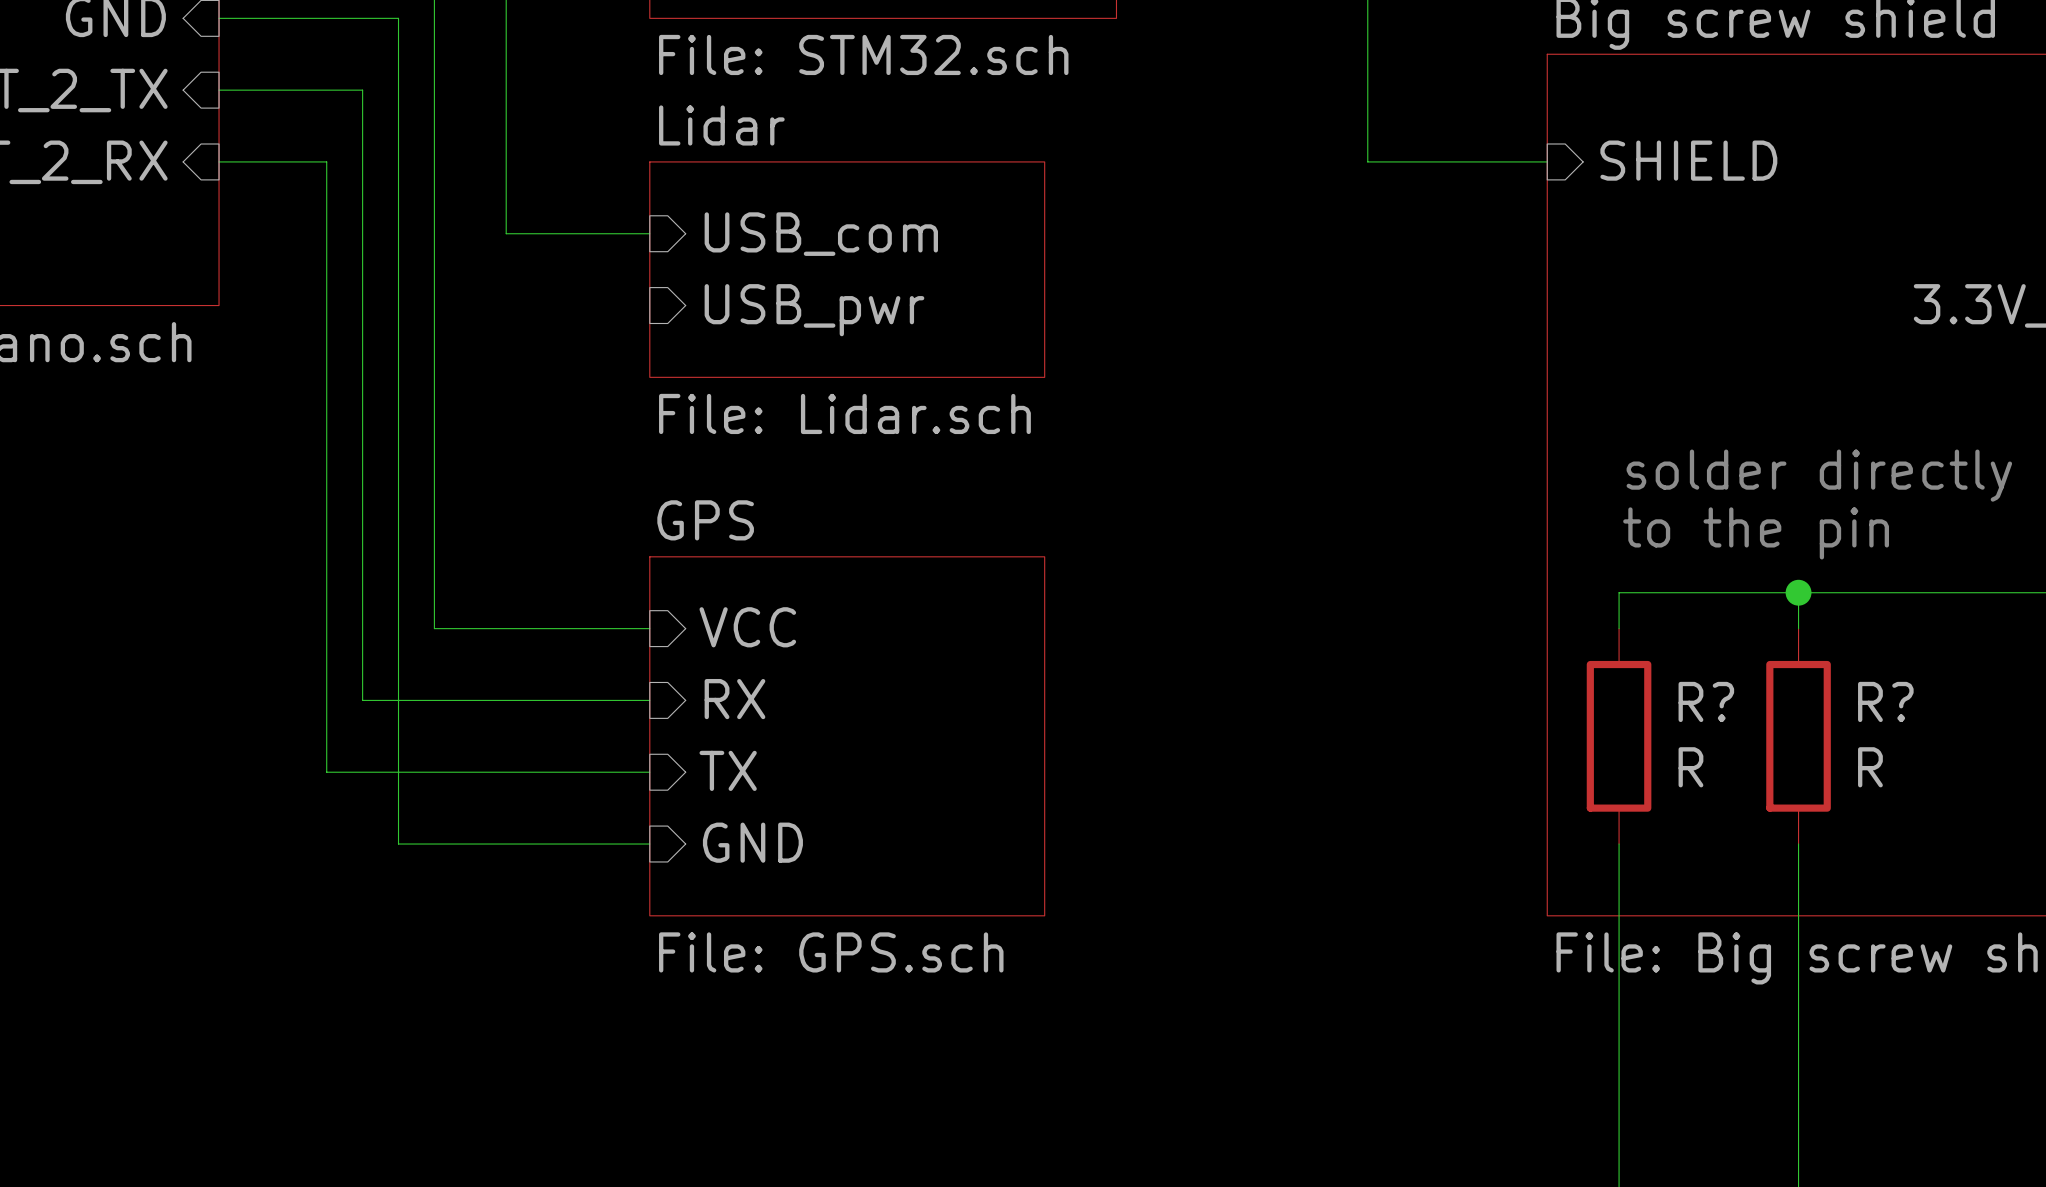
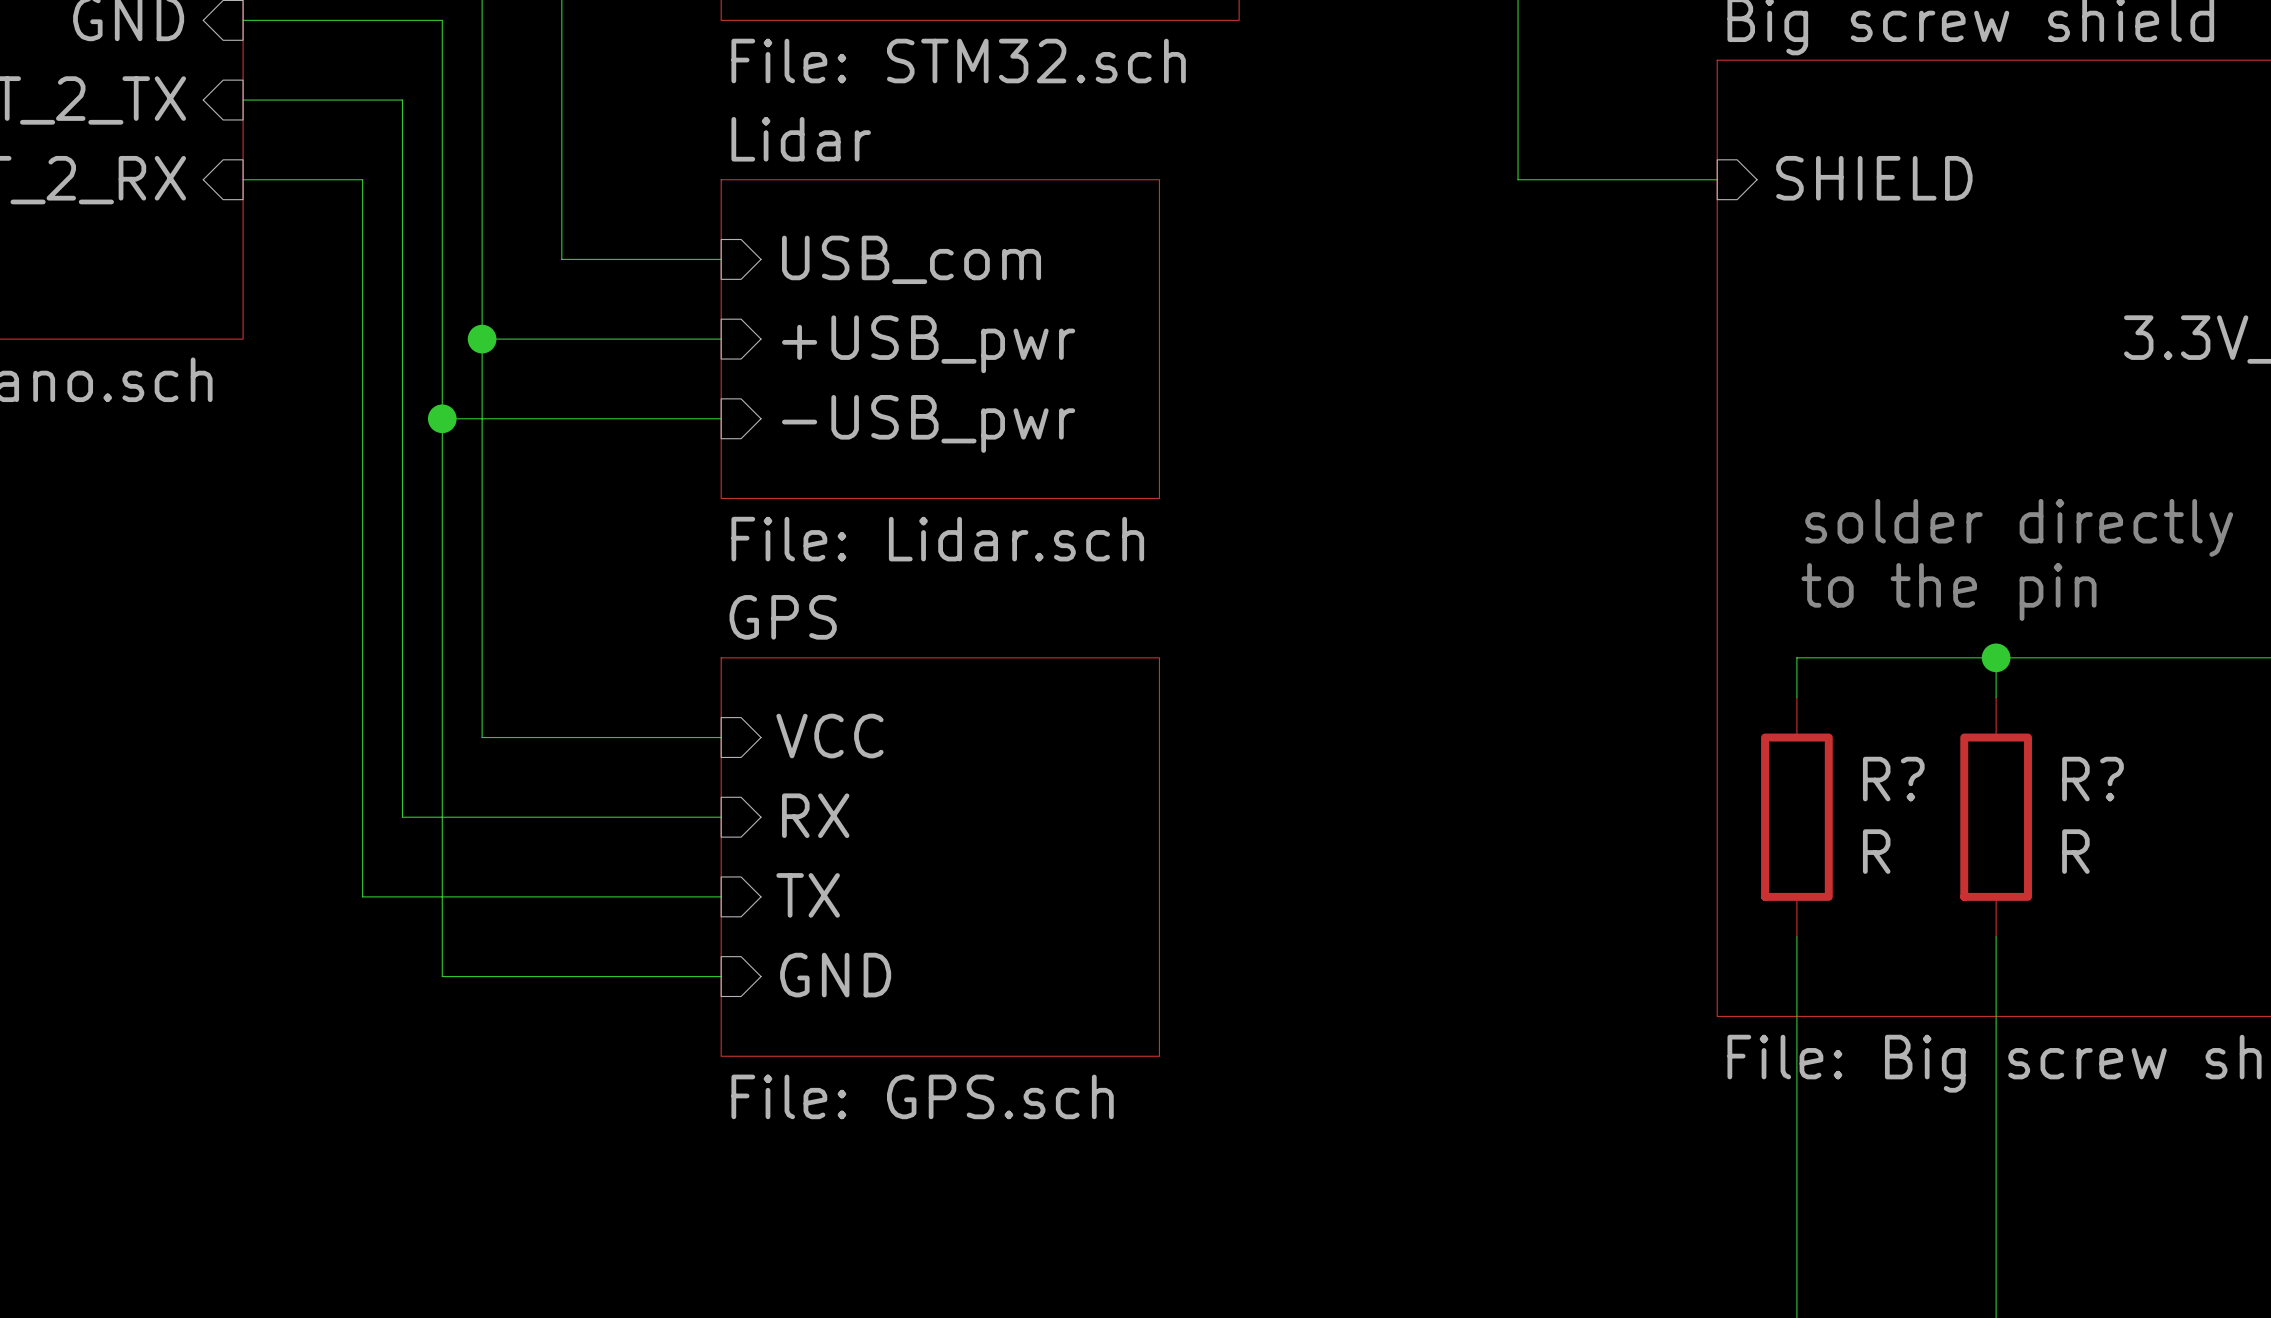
sheet Lidar: File: Lidar.sch (847, 269) -> none
wire: none -> (482, 339) (721, 339)
junction: none -> (482, 339)
sheet Lidar: none -> File: Lidar.sch (940, 339)
sheet pin: USB_pwr (814, 310) -> +USB_pwr (928, 344)
wire: none -> (442, 418) (721, 418)
junction: none -> (442, 418)
sheet pin: none -> -USB_pwr (928, 423)
sheet pin position: VCC (747, 627) -> VCC (829, 736)
wire: (434, 628) (649, 628) -> (482, 697) (482, 737) (721, 737)
sheet pin position: RX (734, 699) -> RX (815, 815)
wire: (362, 700) (649, 700) -> (402, 777) (402, 817) (721, 817)
sheet GPS position: (847, 736) -> (940, 857)
sheet pin position: TX (728, 770) -> TX (808, 895)
wire: (326, 772) (649, 772) -> (362, 857) (362, 896) (721, 896)
sheet pin position: GND (752, 842) -> GND (835, 975)
wire: (398, 844) (649, 844) -> (442, 936) (442, 976) (721, 976)

